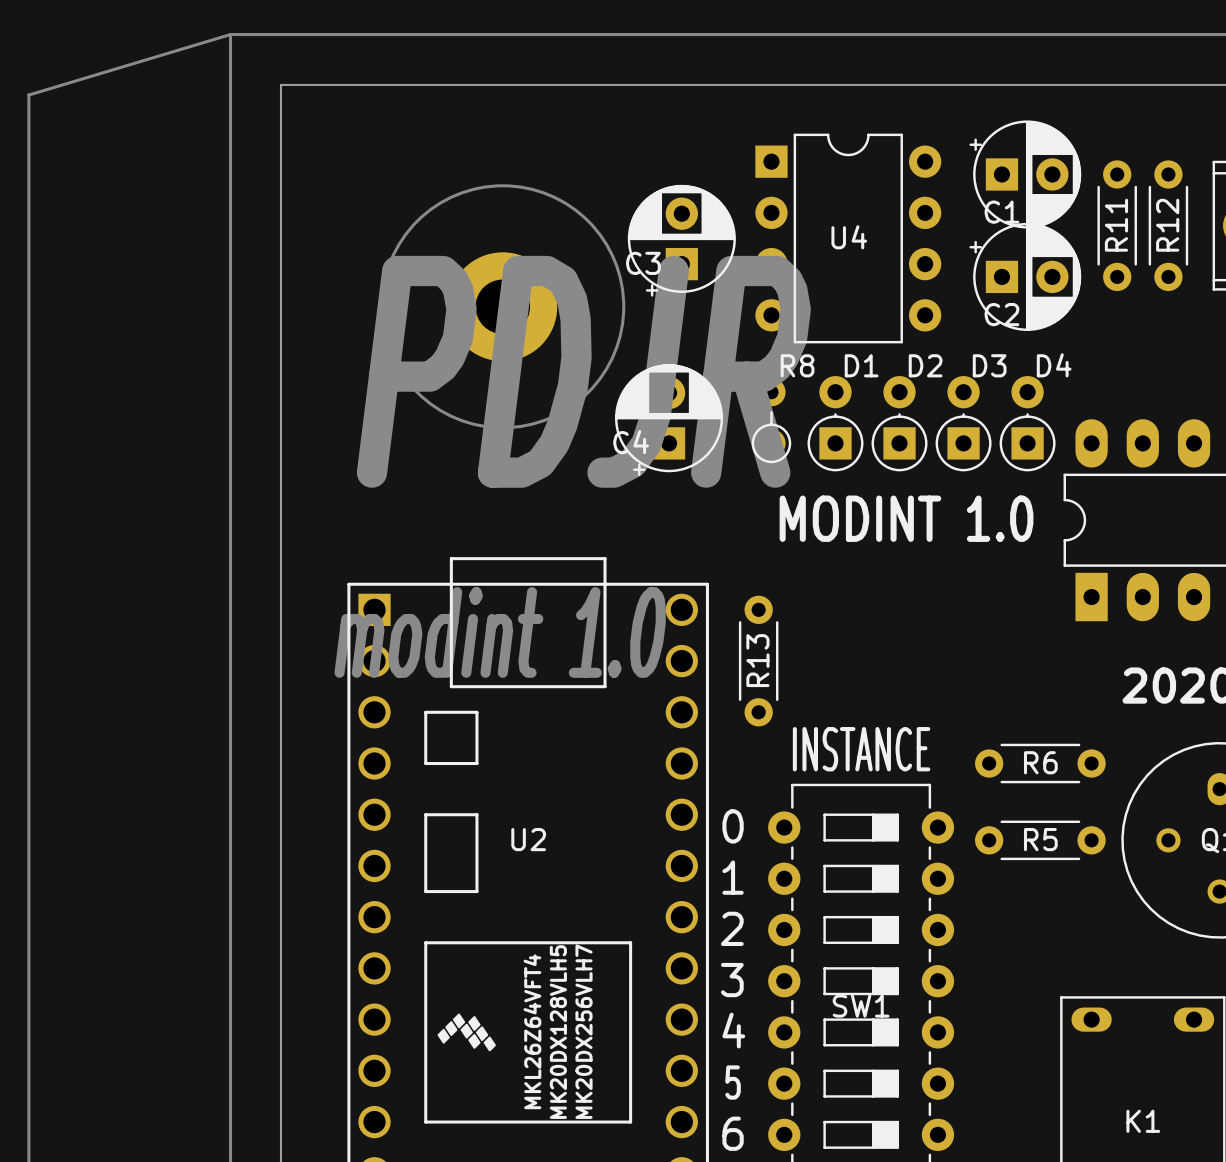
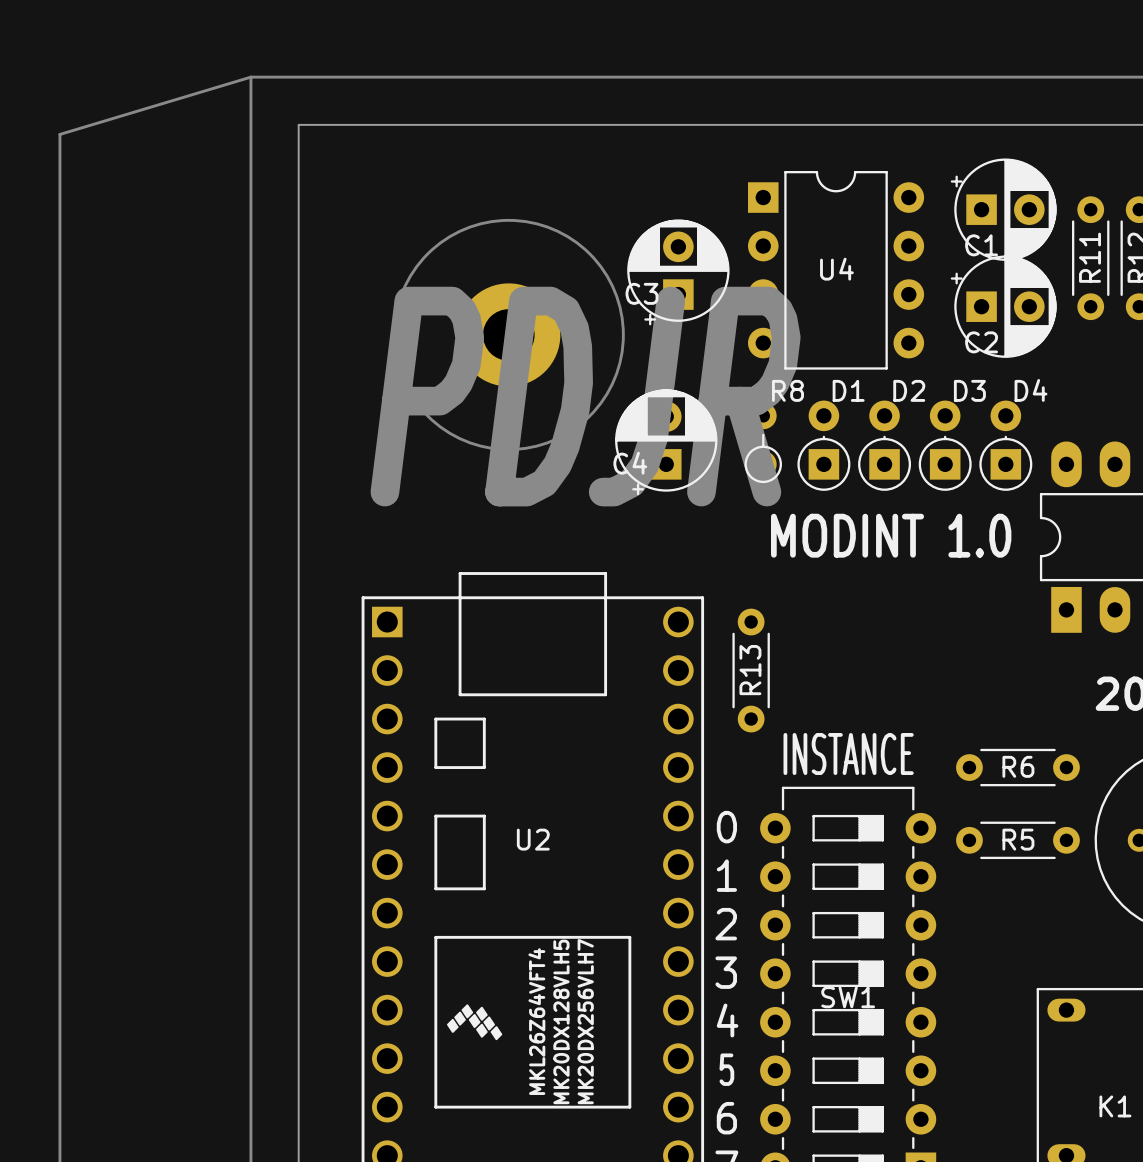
text: modint 1.0 (500, 632) -> none

